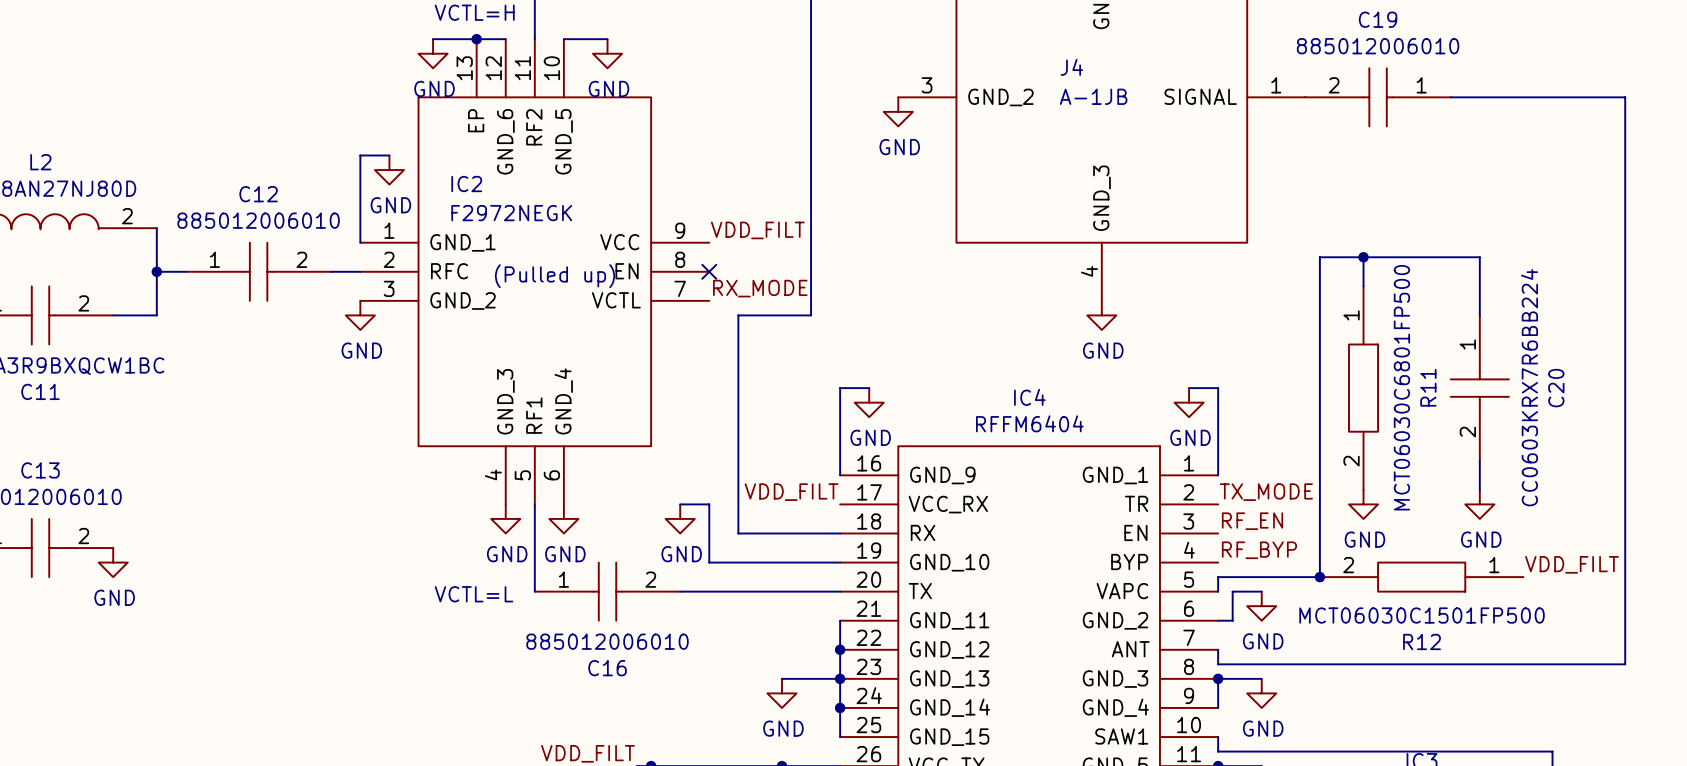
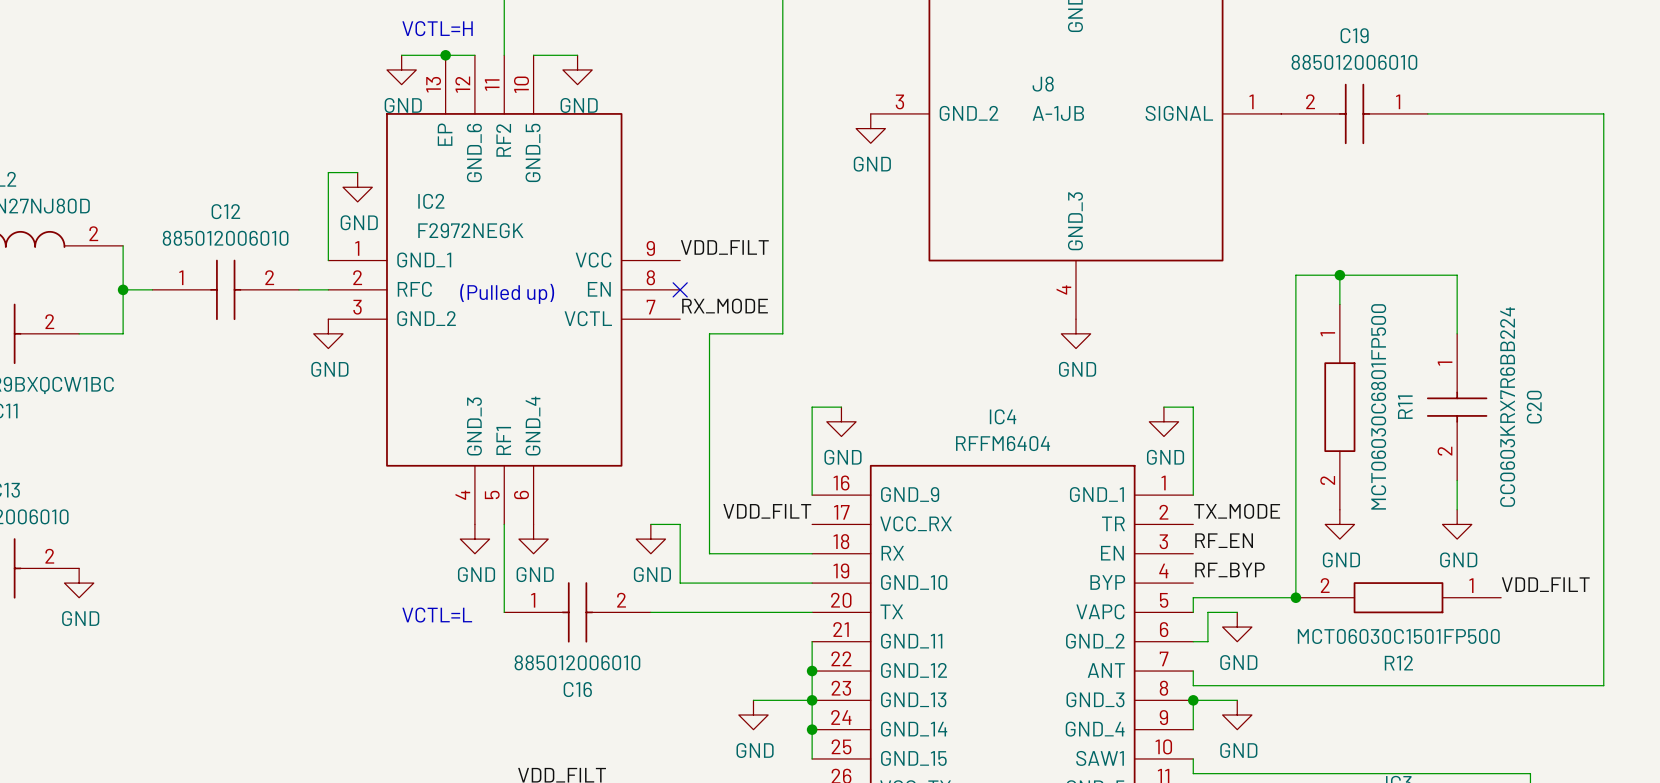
J4 name: J4 (1071, 67) -> J8 (1043, 84)

